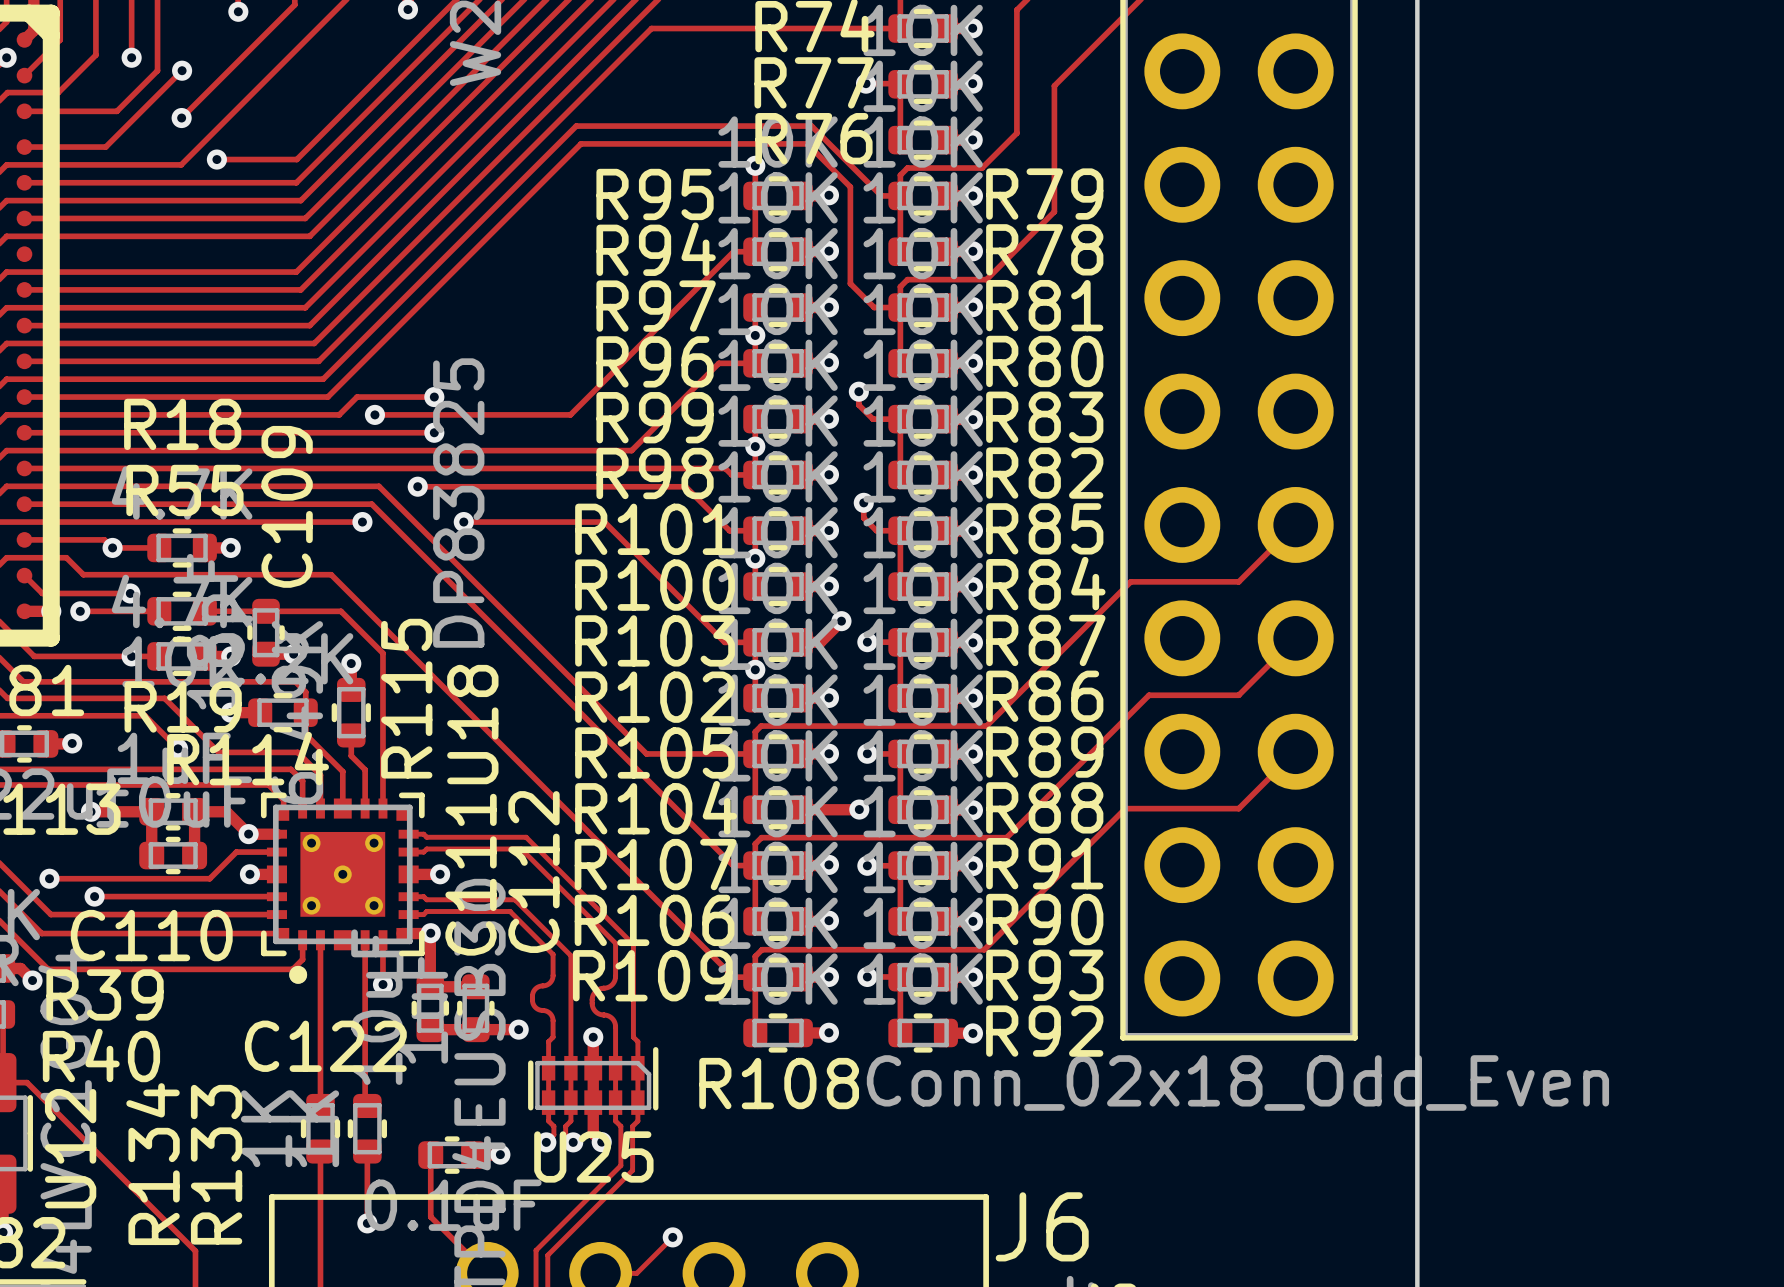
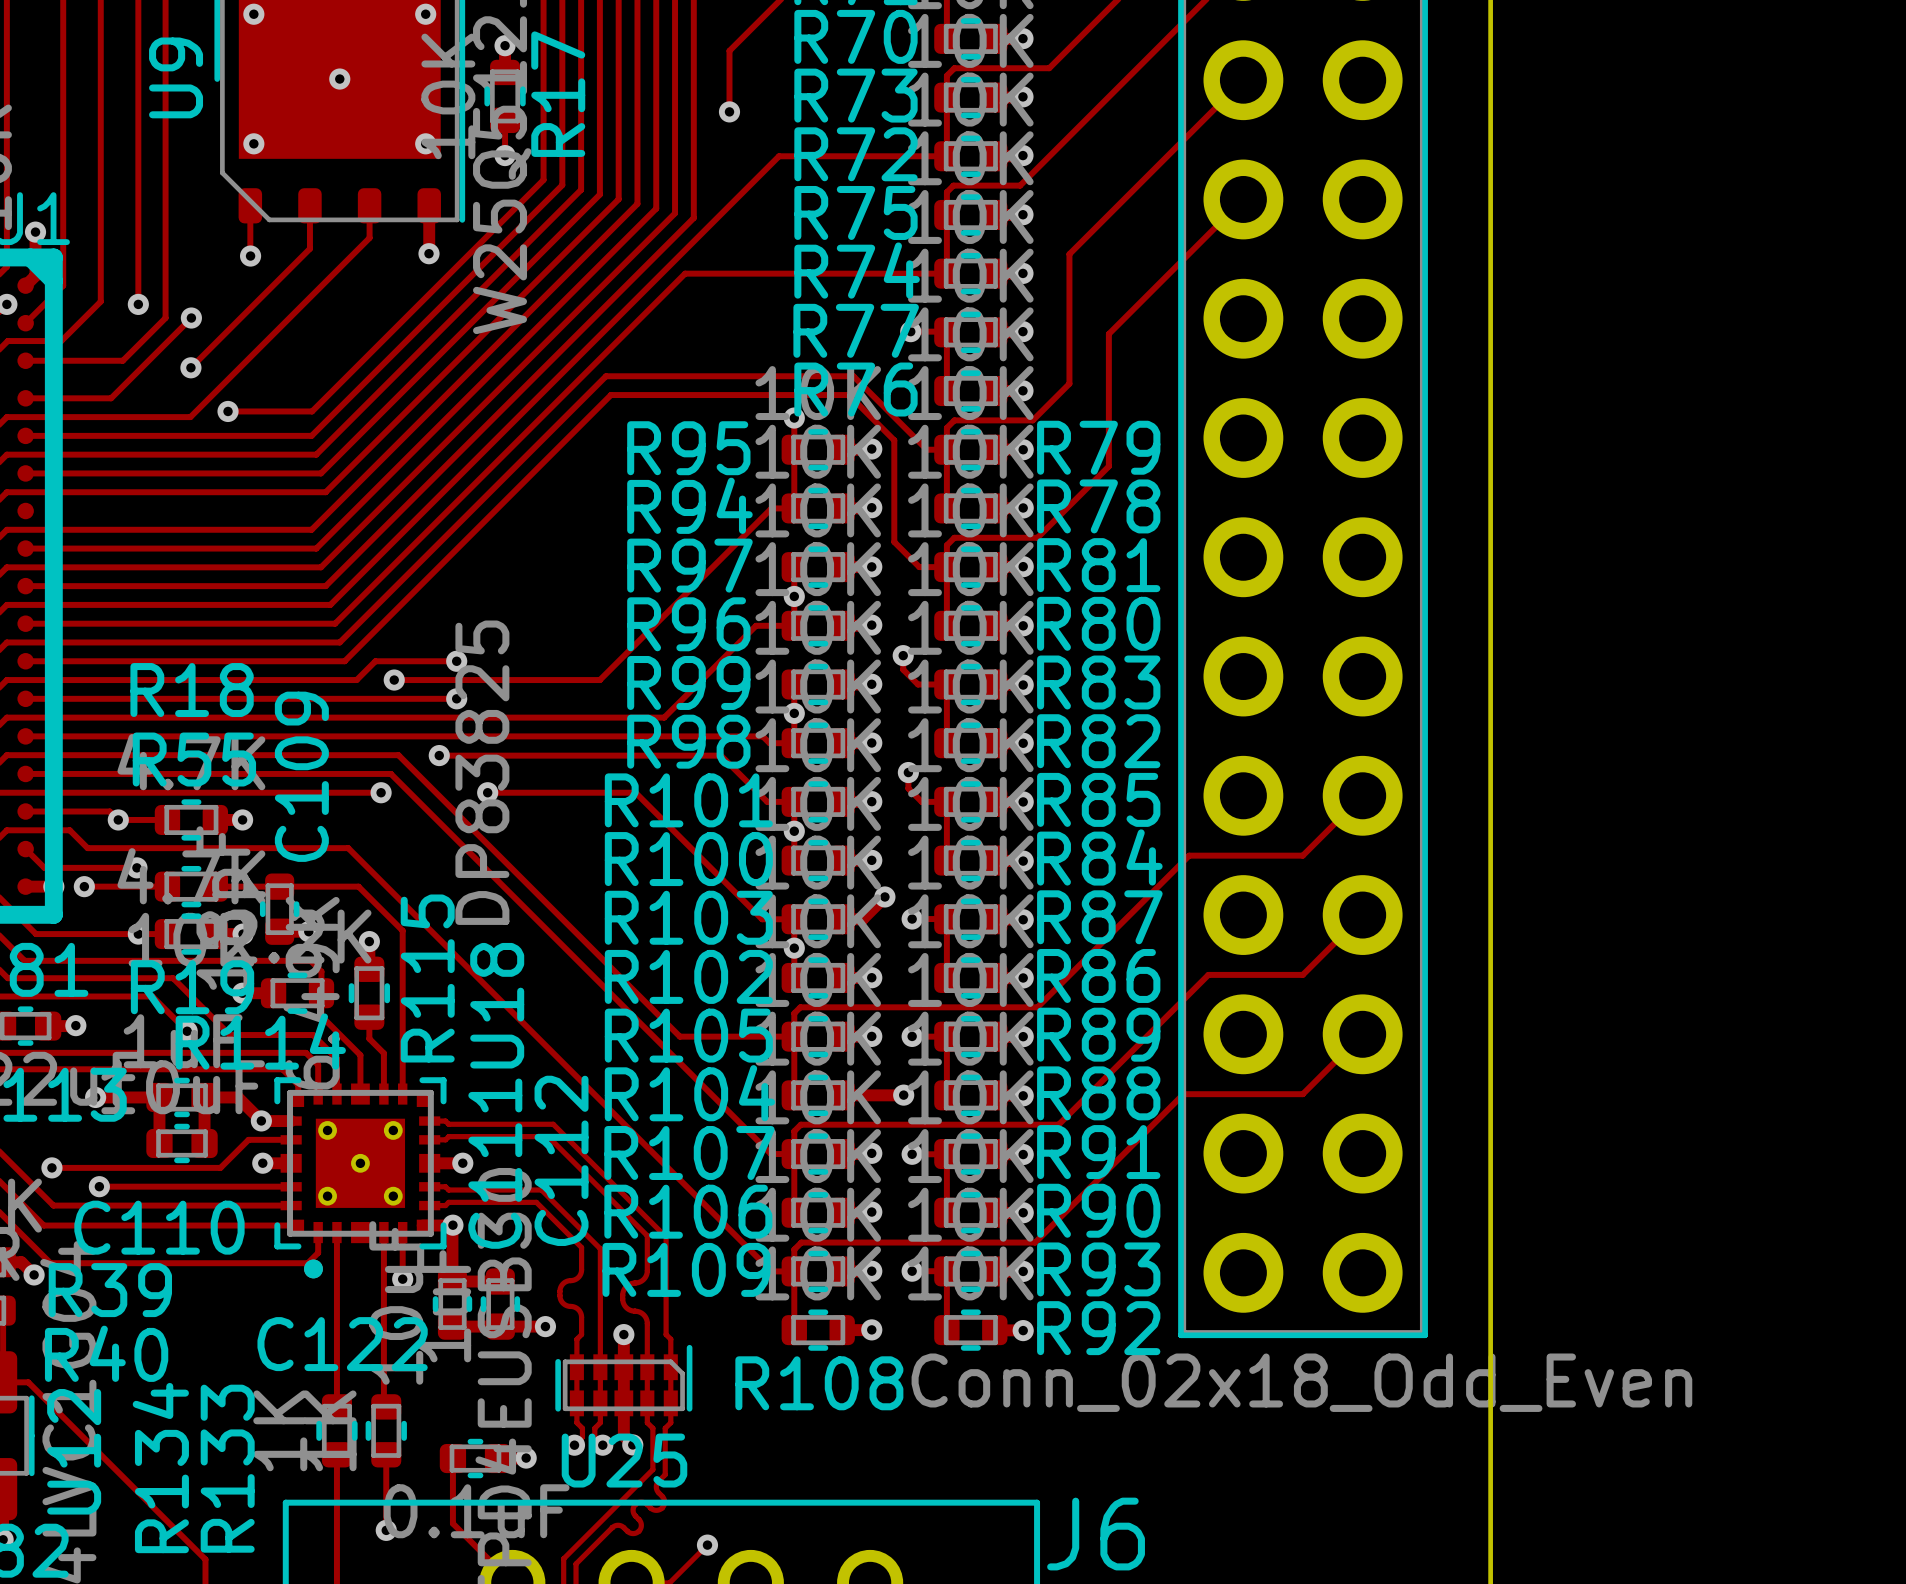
track: (626, 1176) (582, 1220) -> (658, 1481) (656, 1488) (664, 1499) (662, 1507) (655, 1510) (644, 1502) (635, 1504) (633, 1512) (641, 1525) (640, 1529) (635, 1533) (629, 1532) (619, 1525) (612, 1527)

